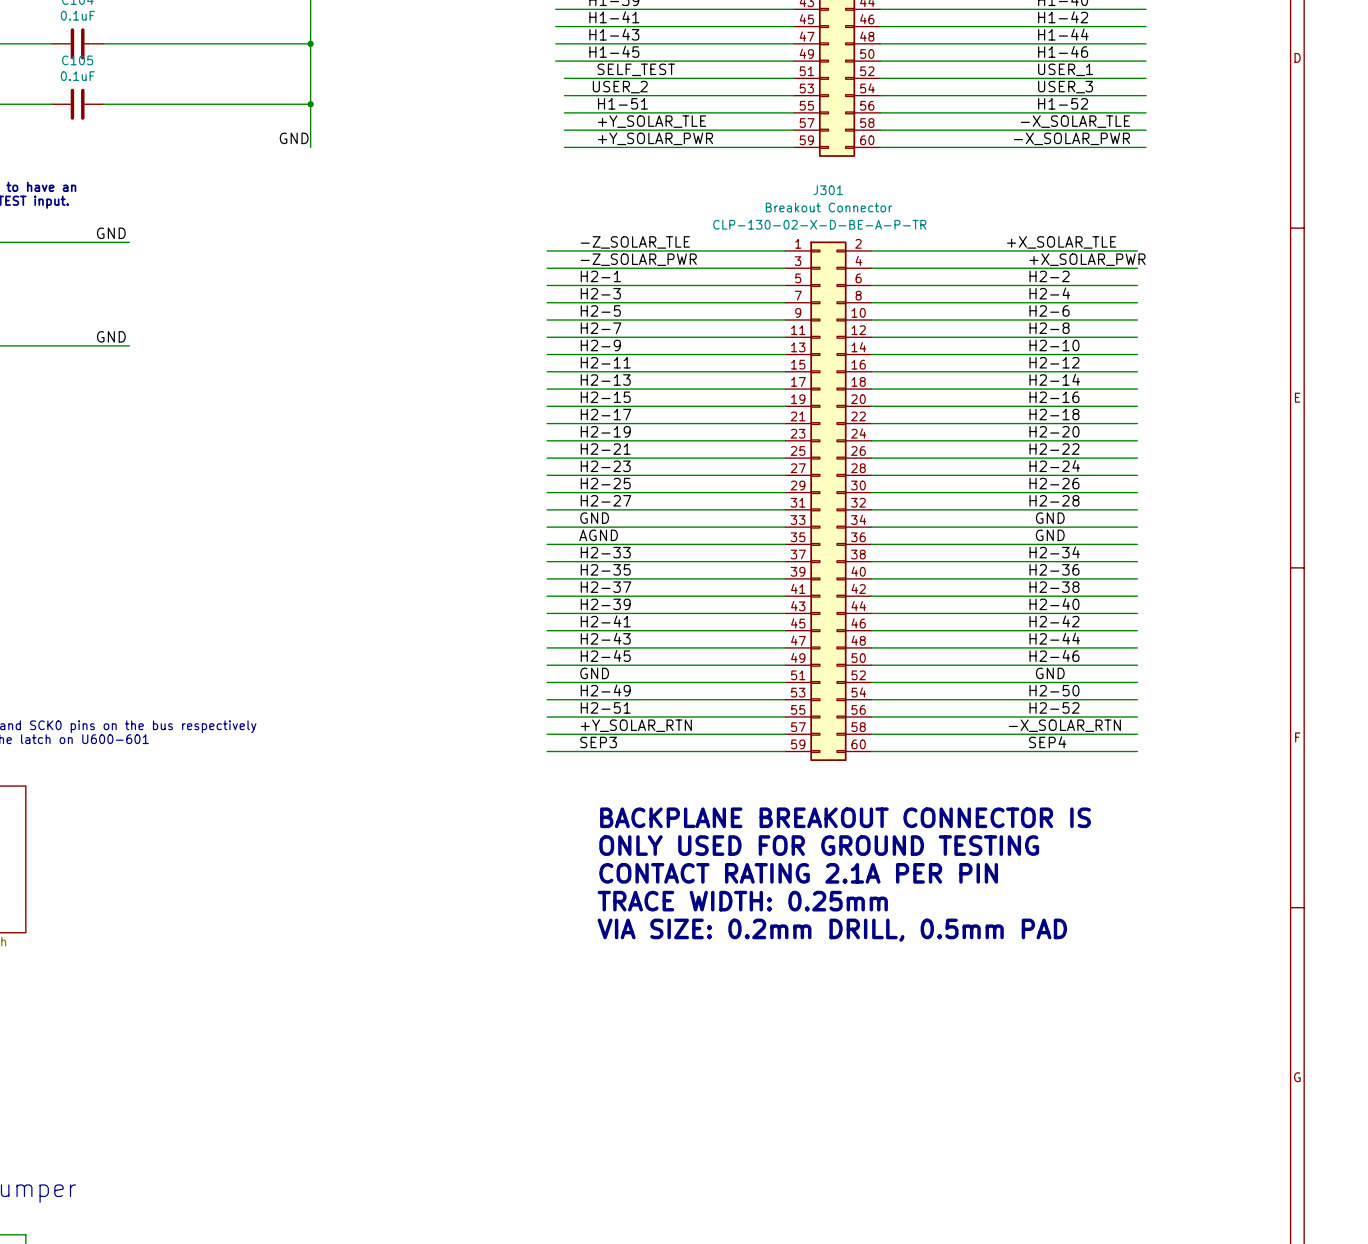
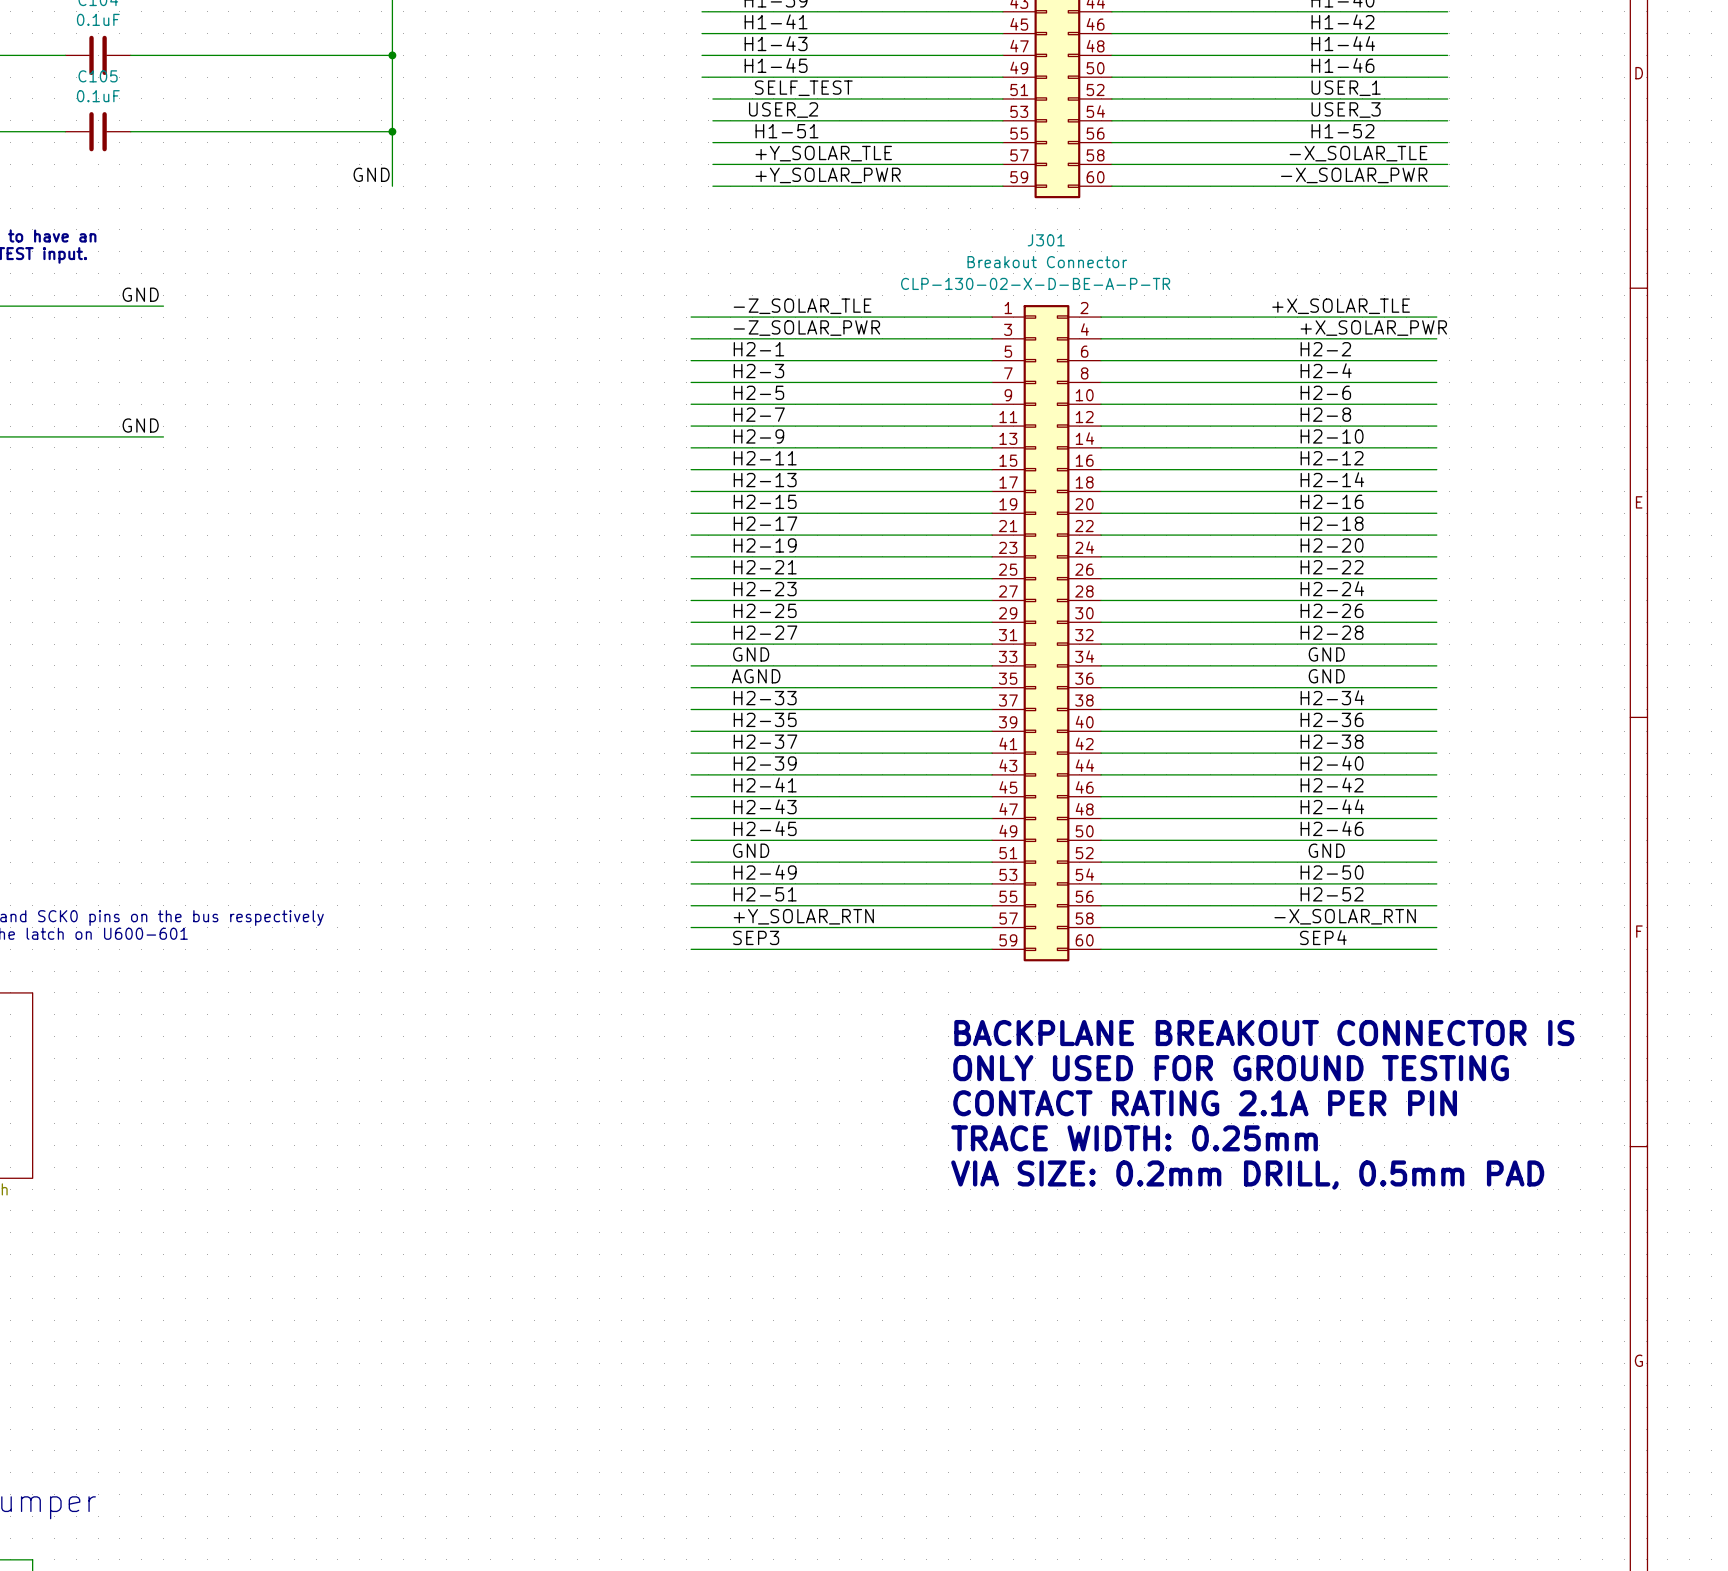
text position: BACKPLANE BREAKOUT CONNECTOR IS (845, 817) -> BACKPLANE BREAKOUT CONNECTOR IS (1264, 1033)
text position: ONLY USED FOR GROUND TESTING (819, 845) -> ONLY USED FOR GROUND TESTING (1231, 1068)
text position: CONTACT RATING 2.1A PER PIN (798, 873) -> CONTACT RATING 2.1A PER PIN (1205, 1103)
text position: TRACE WIDTH: 0.25mm (742, 901) -> TRACE WIDTH: 0.25mm (1134, 1138)
text position: VIA SIZE: 0.2mm DRILL, 0.5mm PAD (832, 930) -> VIA SIZE: 0.2mm DRILL, 0.5mm PAD (1247, 1175)

